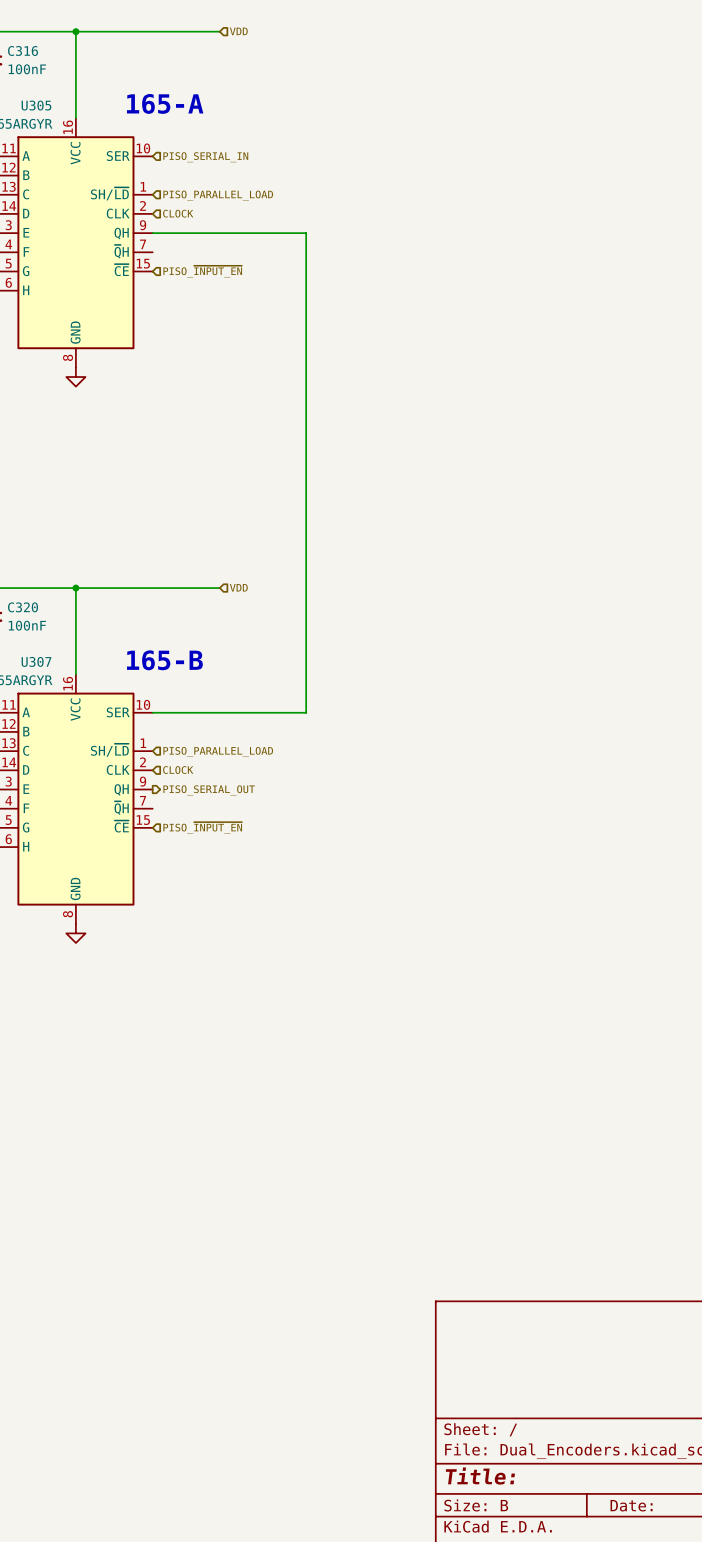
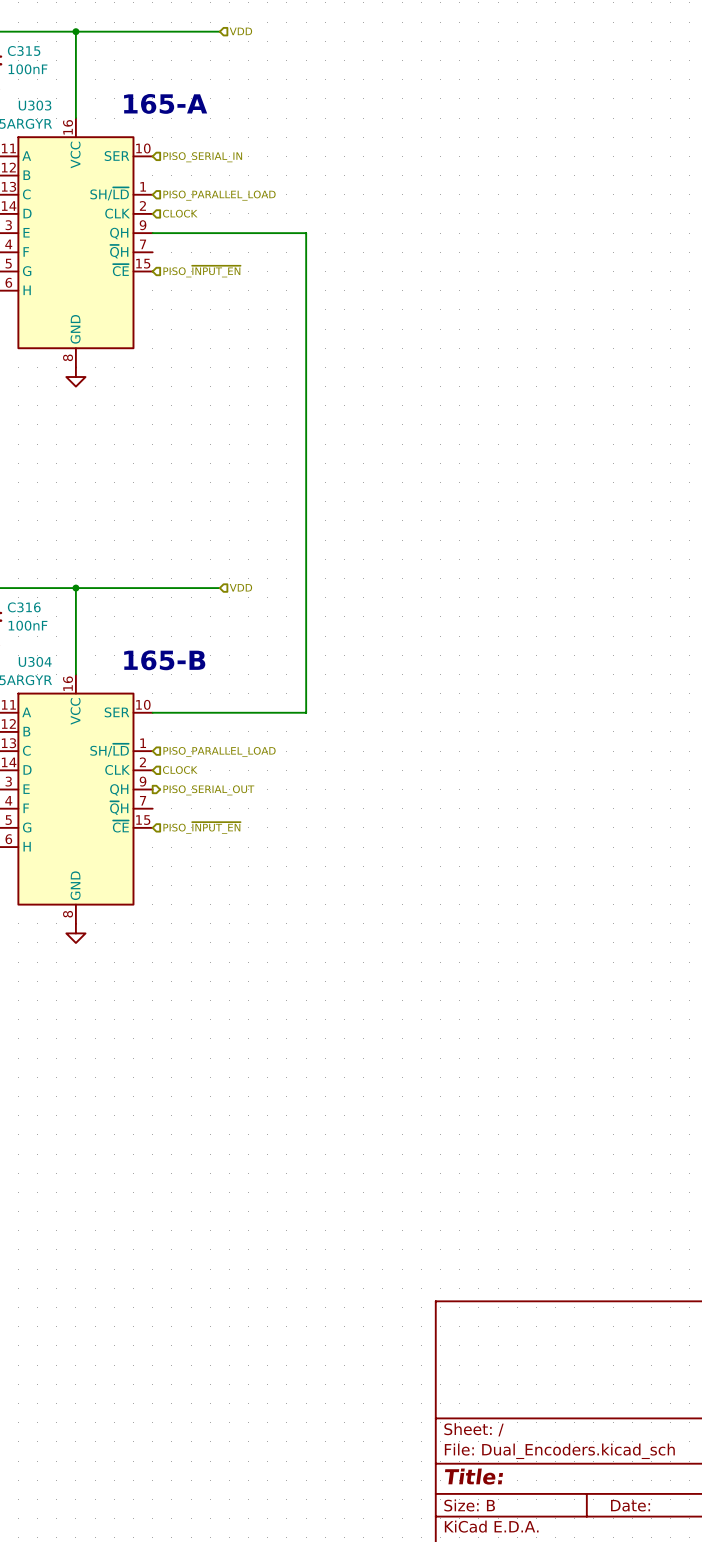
C316 name: C316 (23, 50) -> C315 (24, 50)
U305 name: U305 (36, 105) -> U303 (35, 105)
C320 name: C320 (23, 607) -> C316 (24, 607)
U307 name: U307 (36, 661) -> U304 (35, 661)

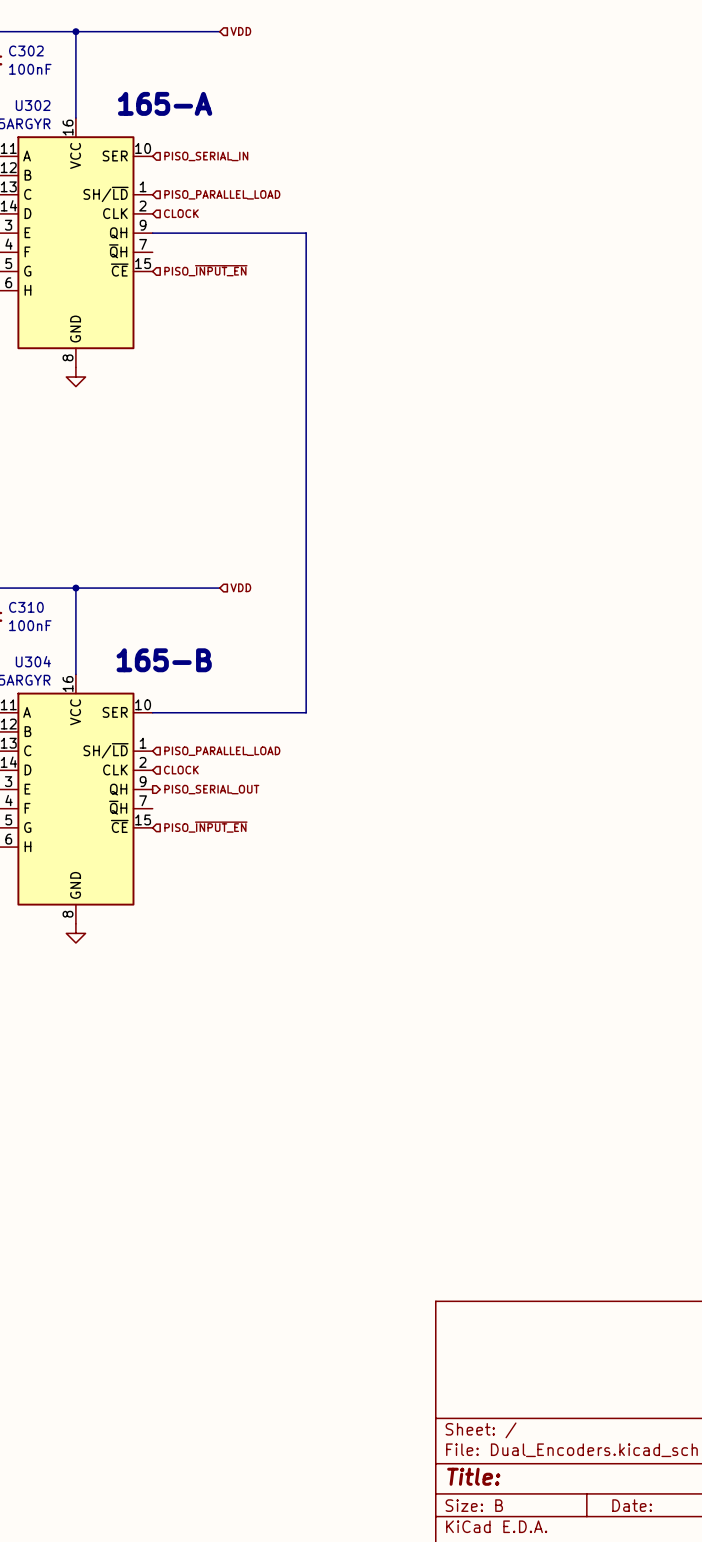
C315 name: C315 (24, 50) -> C302 (26, 50)
U303 name: U303 (35, 105) -> U302 (33, 105)
C316 name: C316 (24, 607) -> C310 (26, 607)

